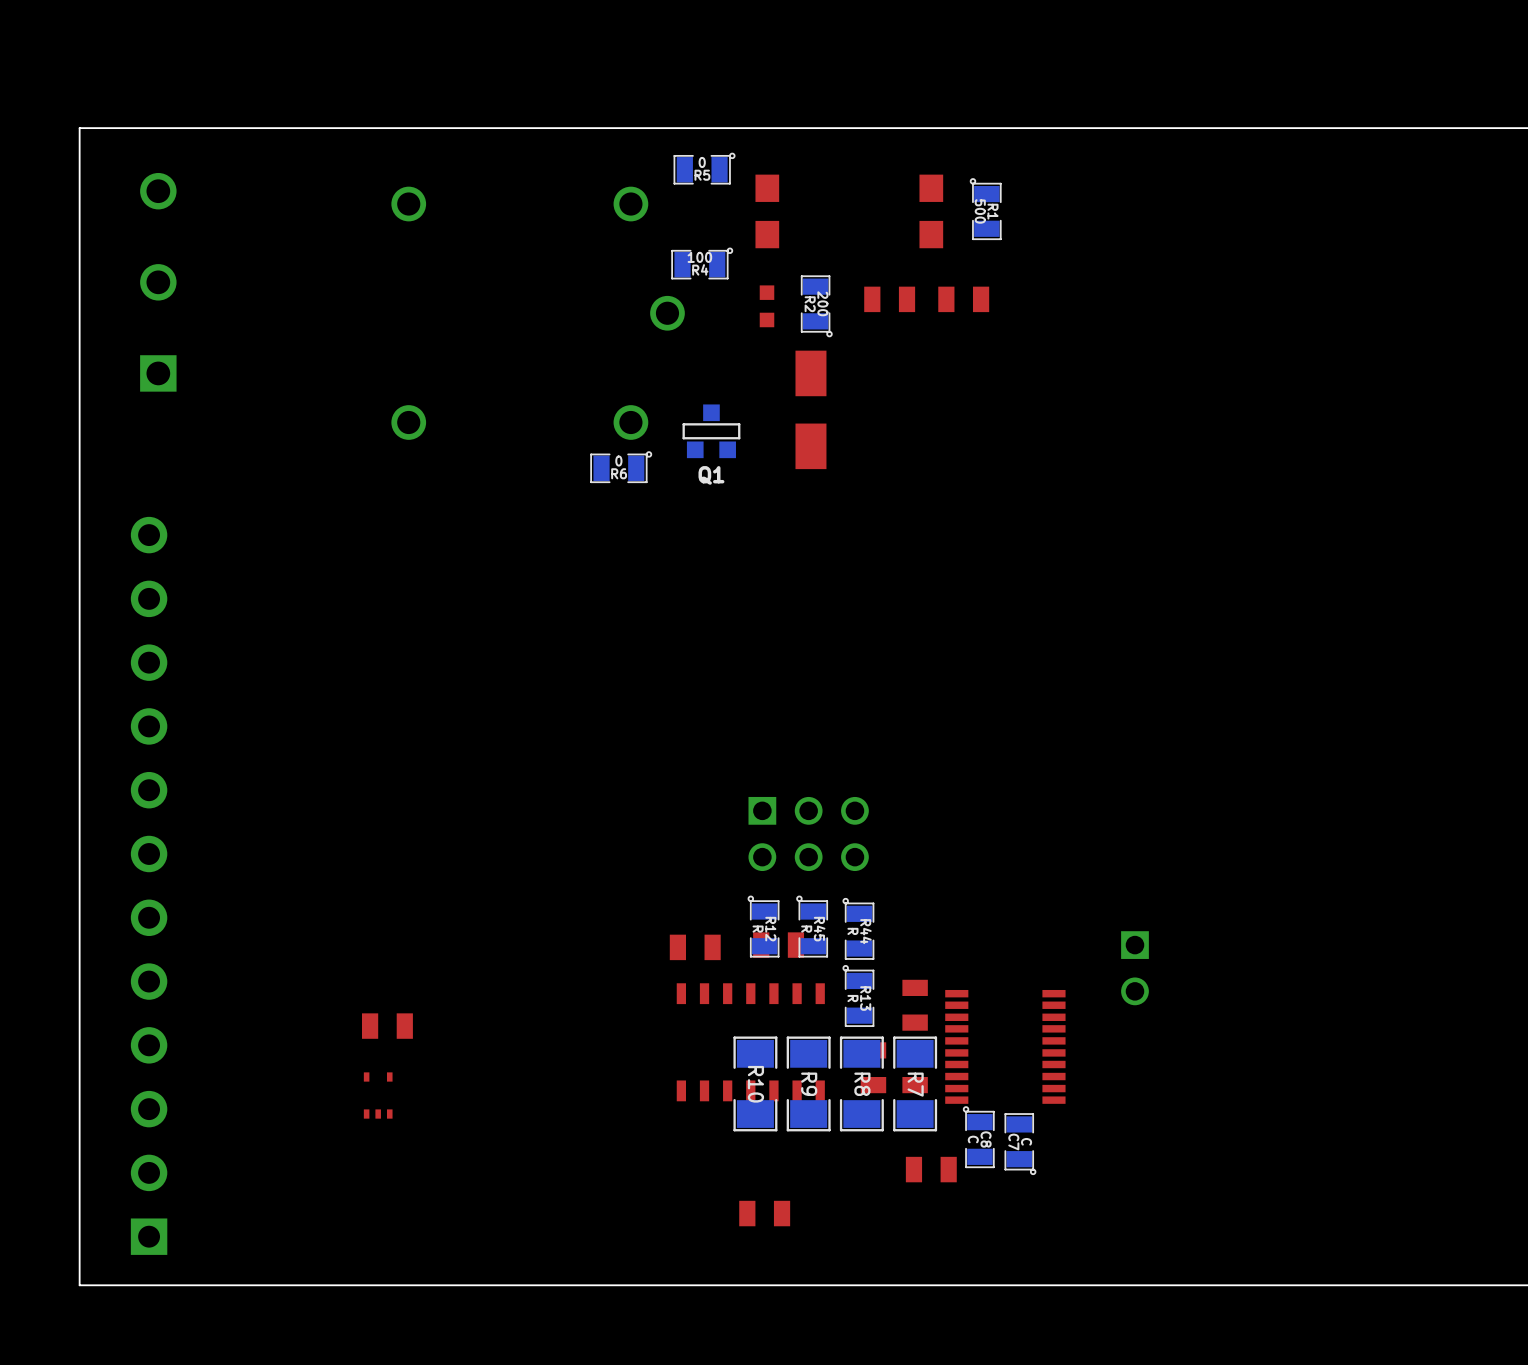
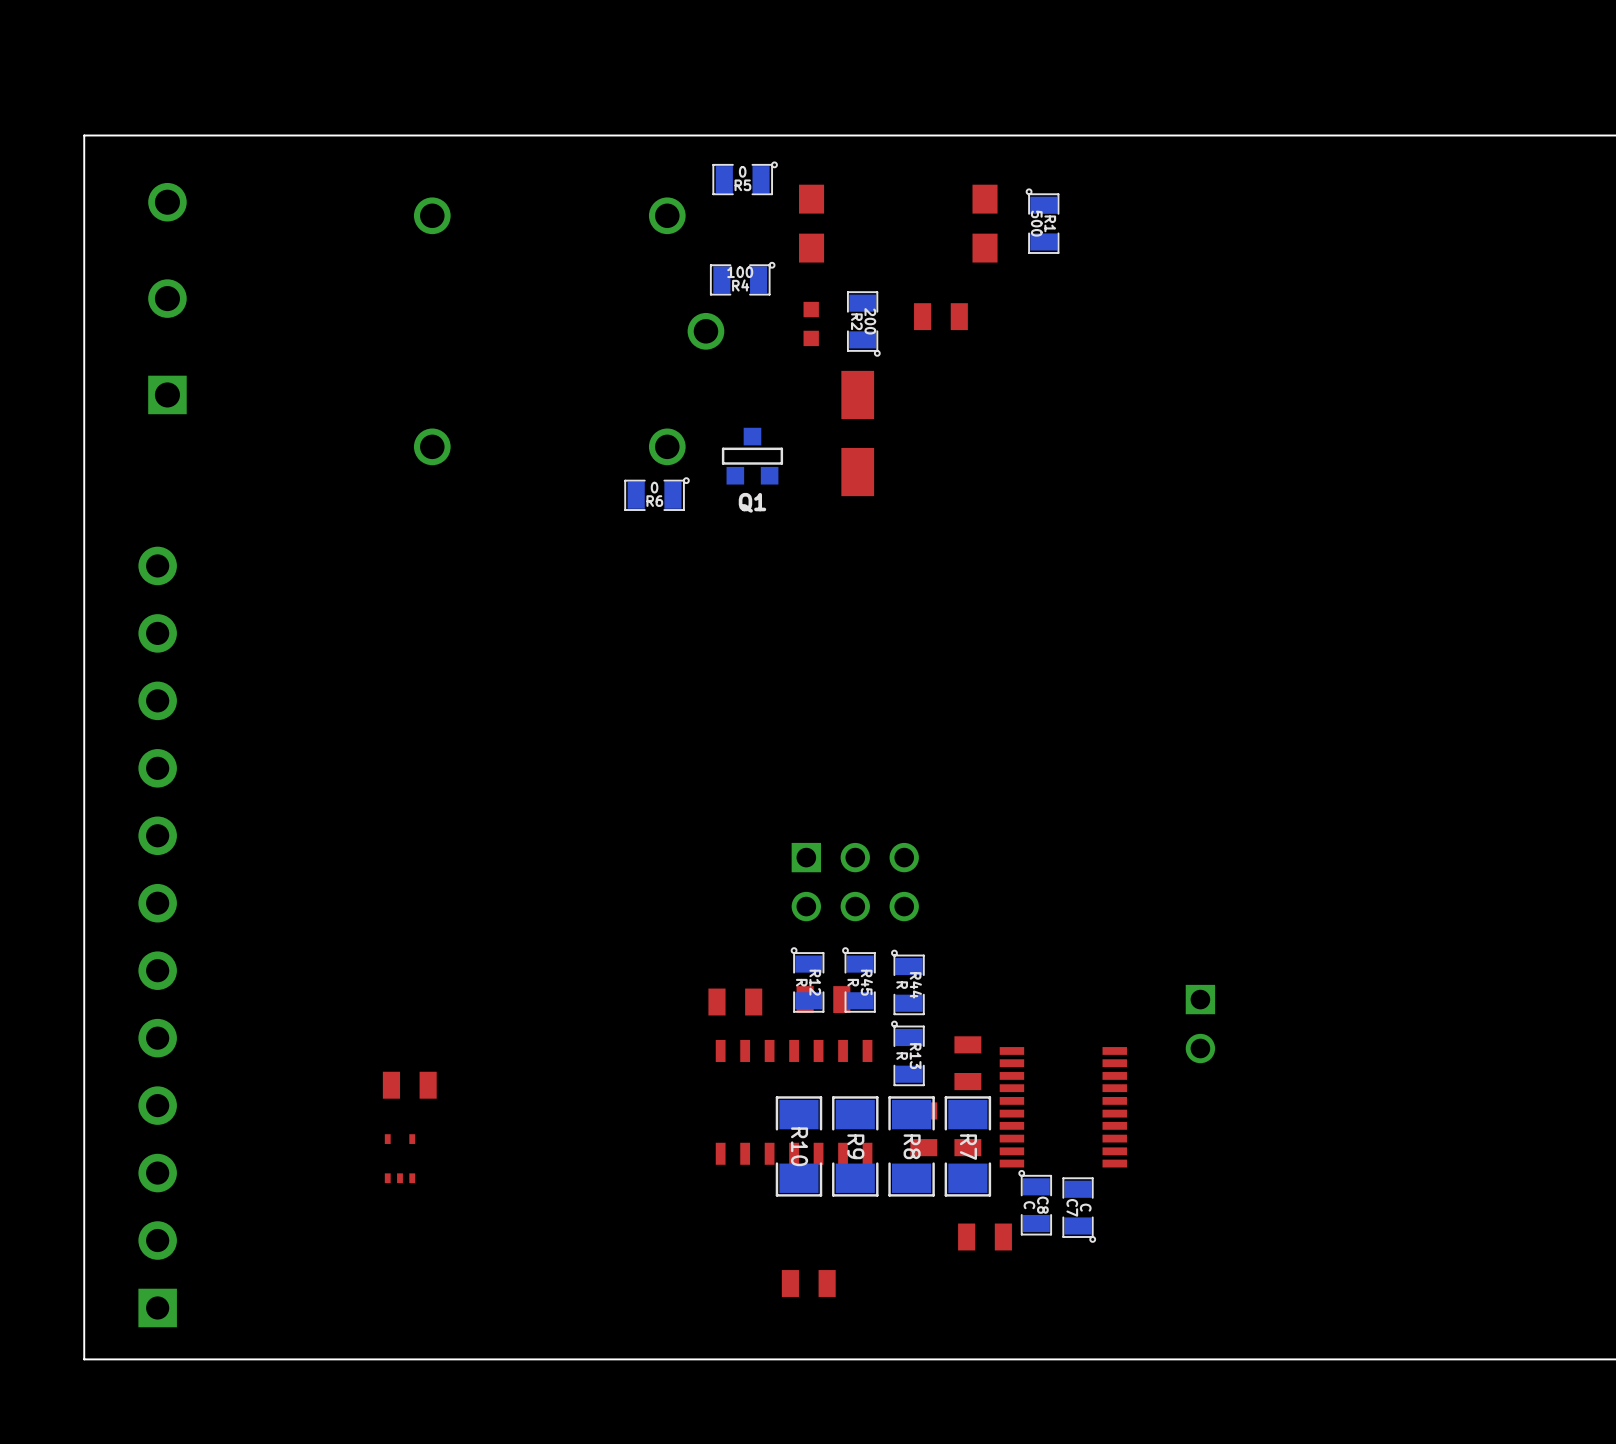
part: (963, 299) -> none

